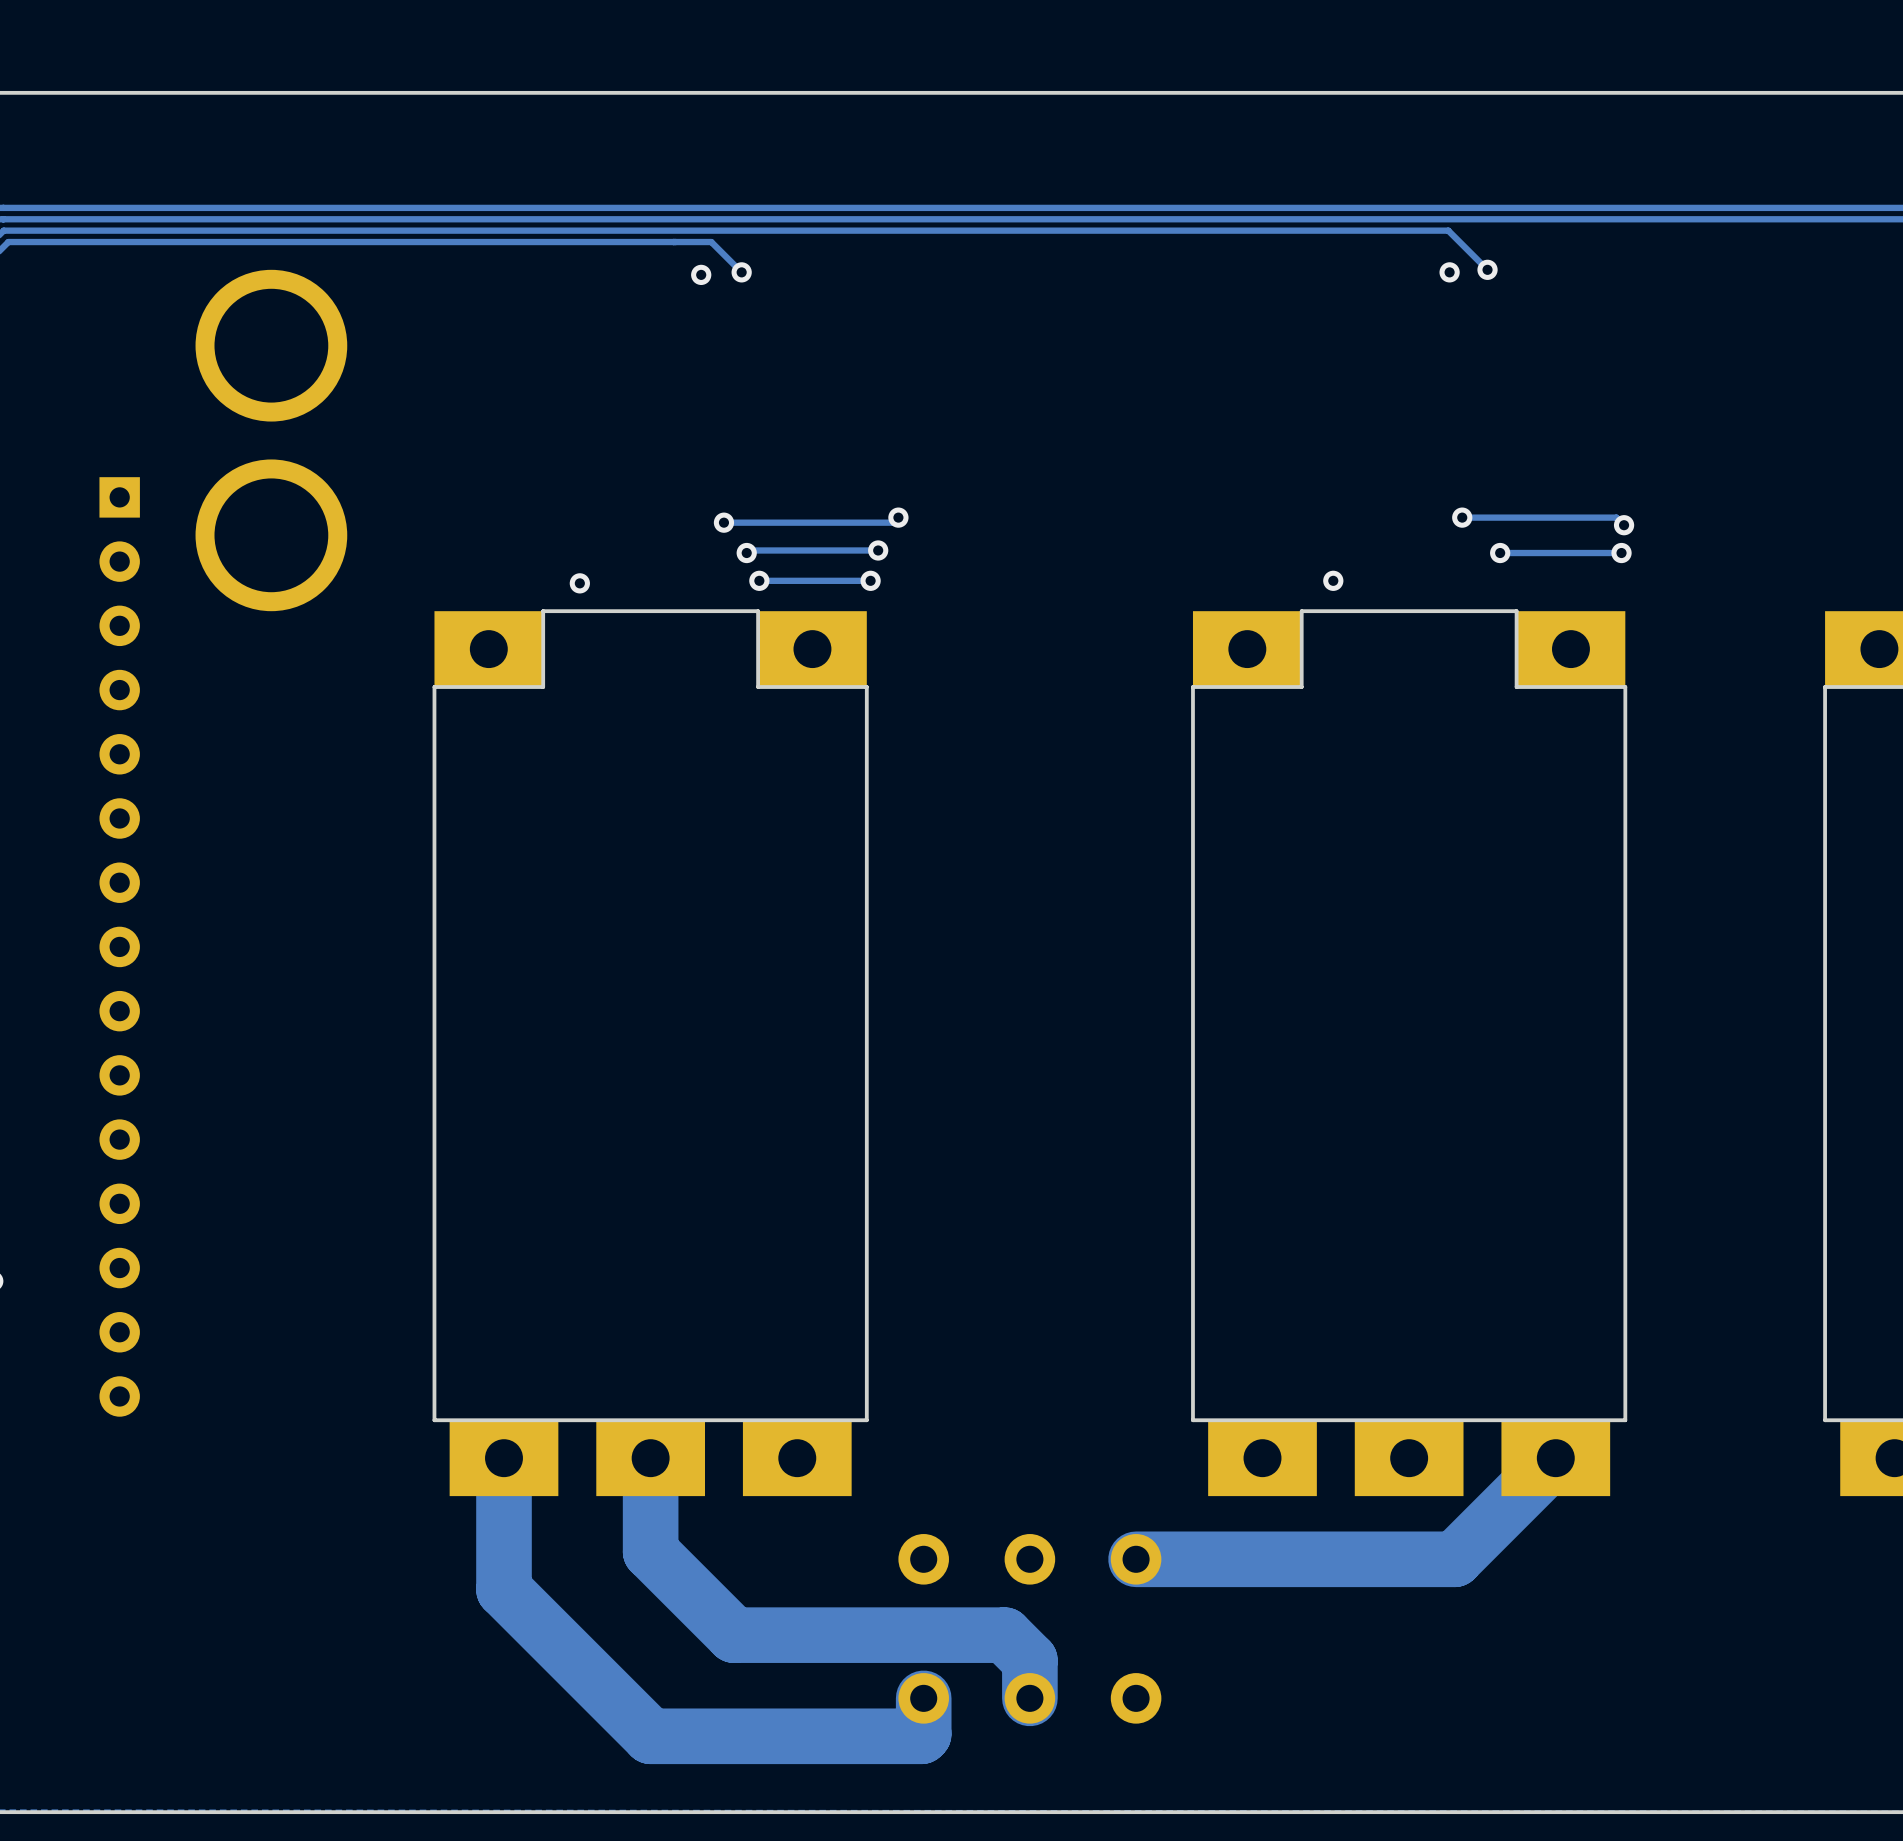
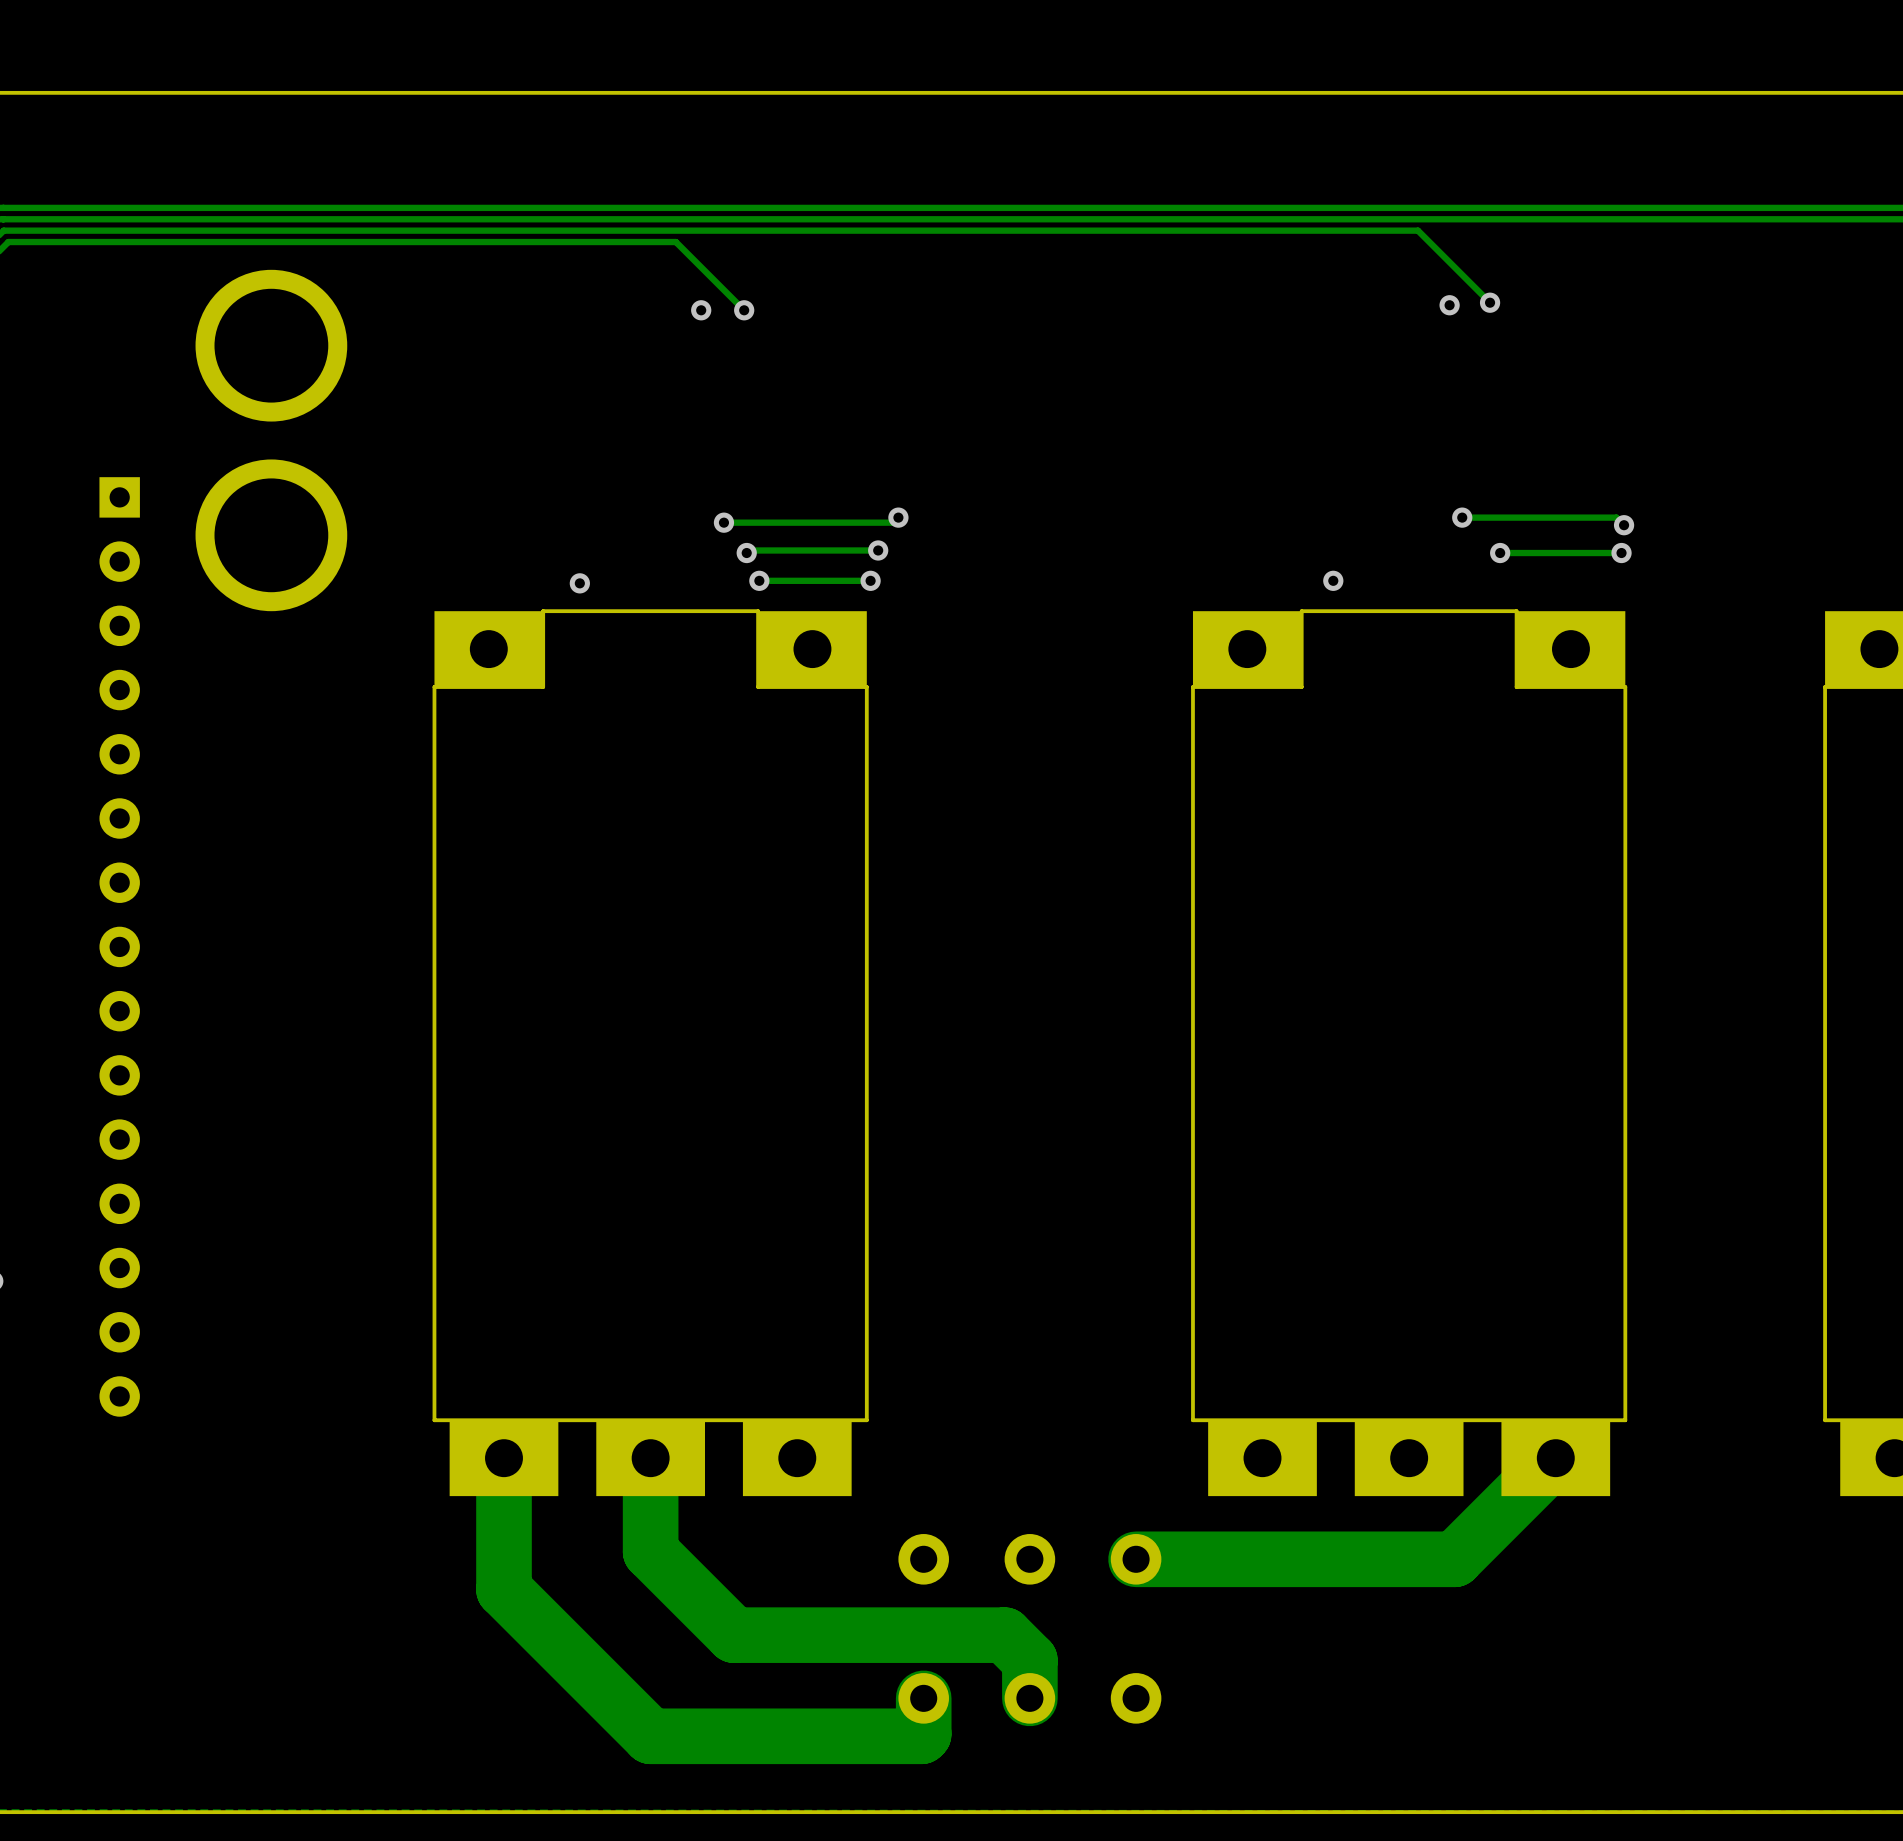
track: (1418, 230) (1448, 230) (1487, 269) -> (1418, 230) (1490, 302)
track: (675, 242) (711, 242) (741, 272) -> (675, 242) (744, 310)
via: (1487, 269) -> none
via: (741, 272) -> none
via: (1449, 272) -> none
via: (701, 274) -> none
via: none -> (1490, 302)
via: none -> (1449, 305)
via: none -> (701, 310)
via: none -> (744, 310)

